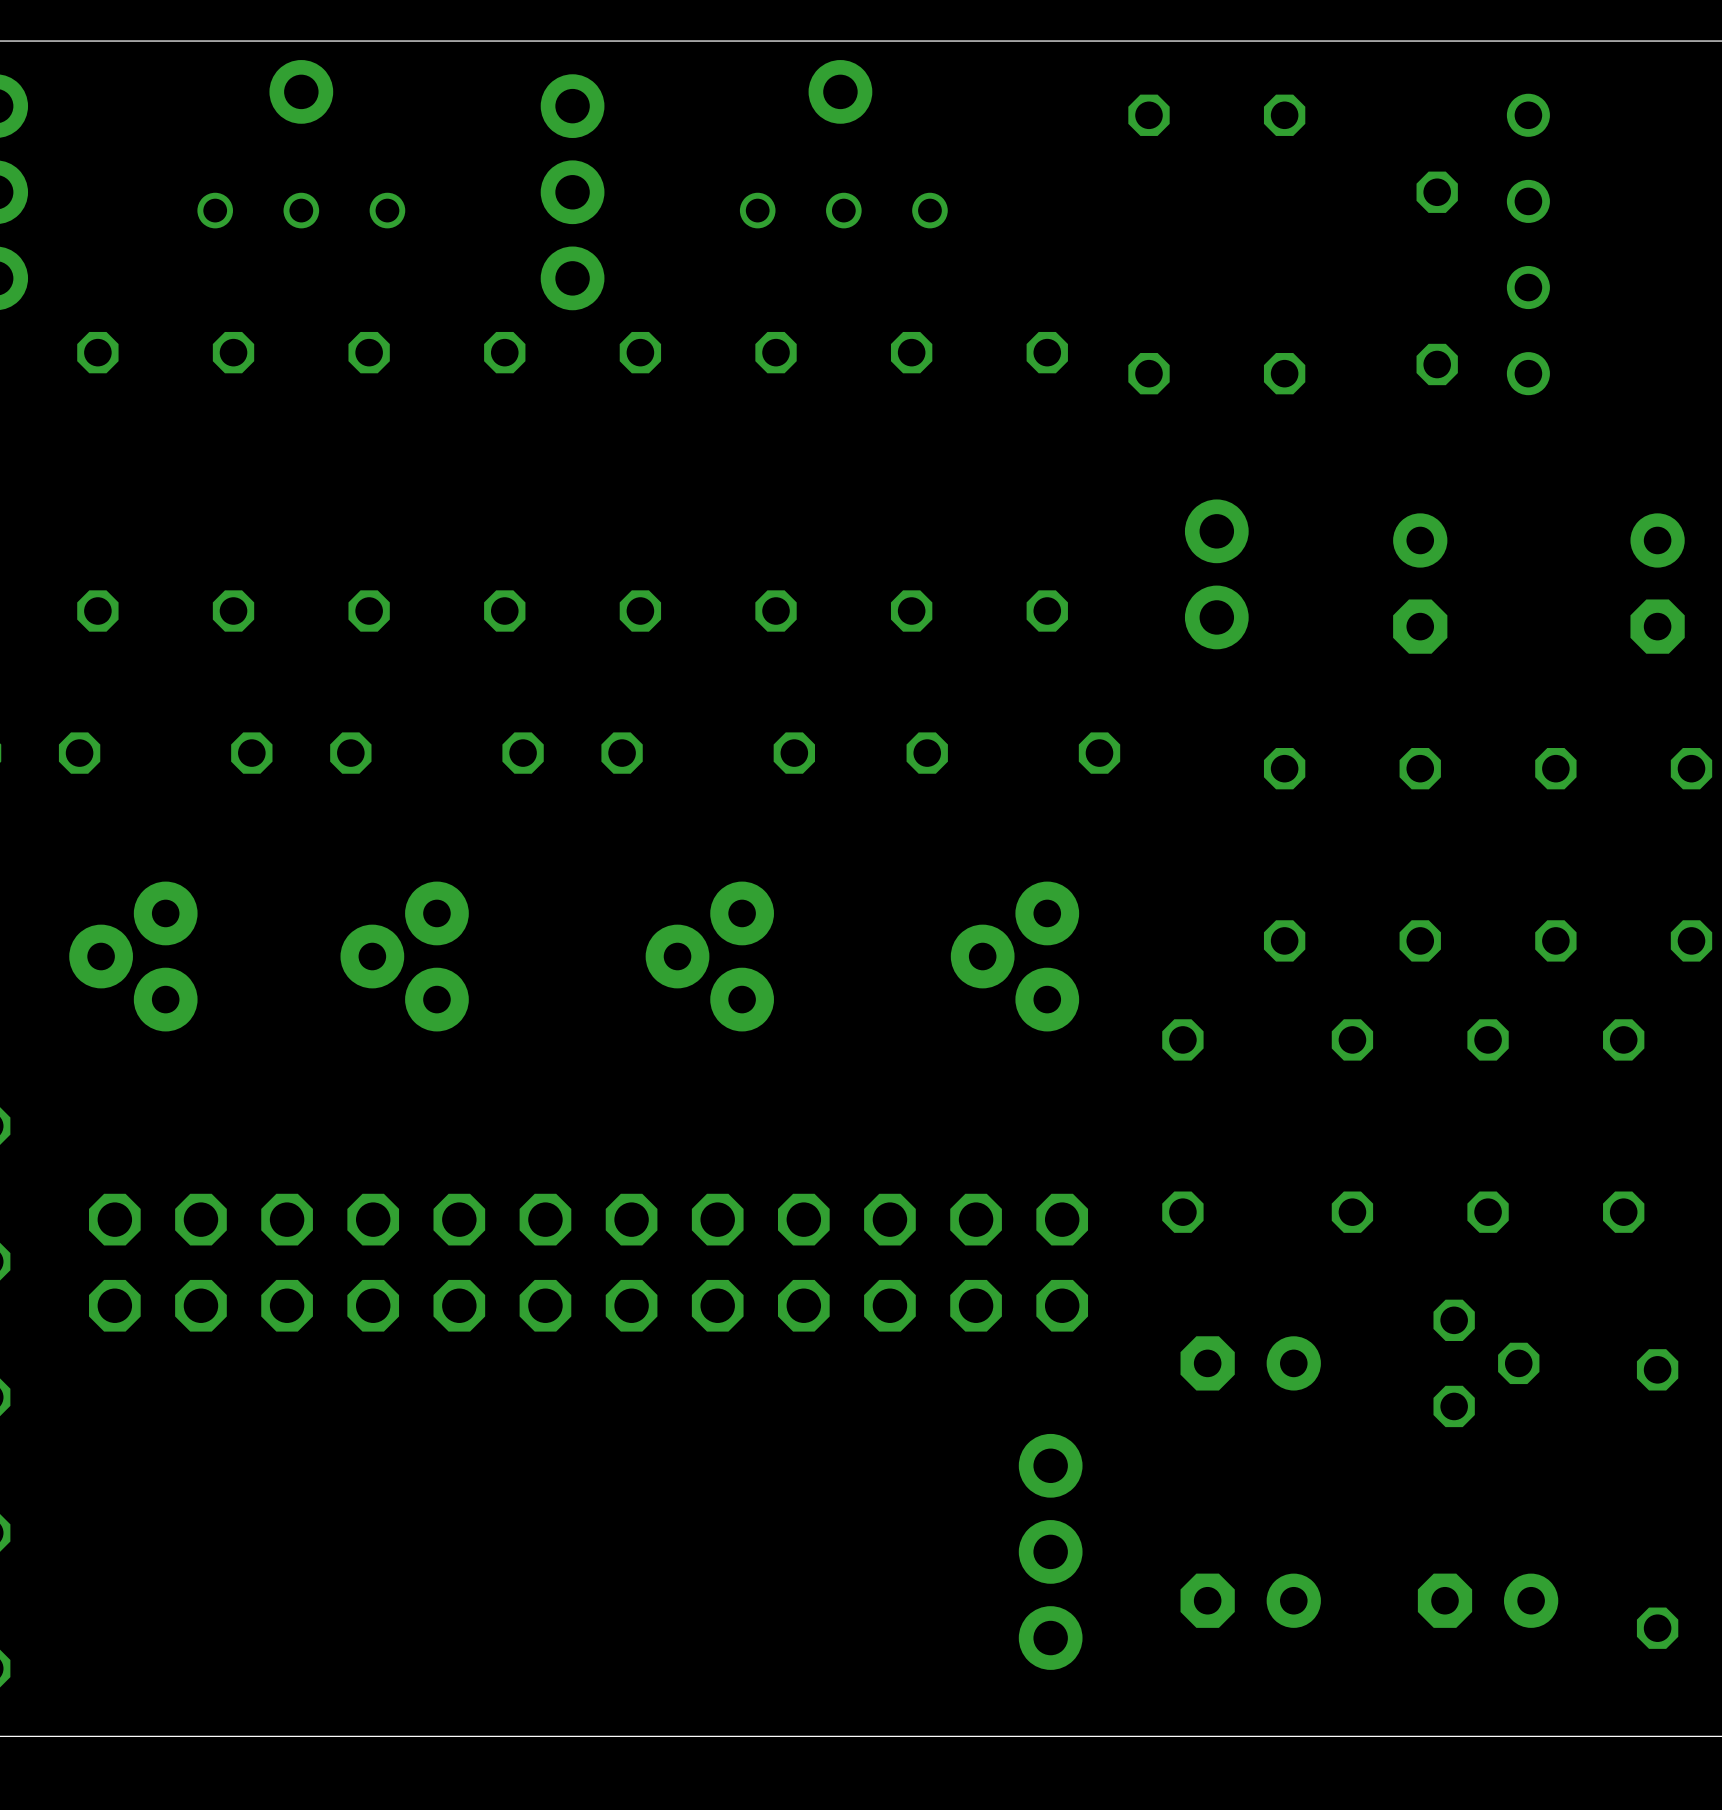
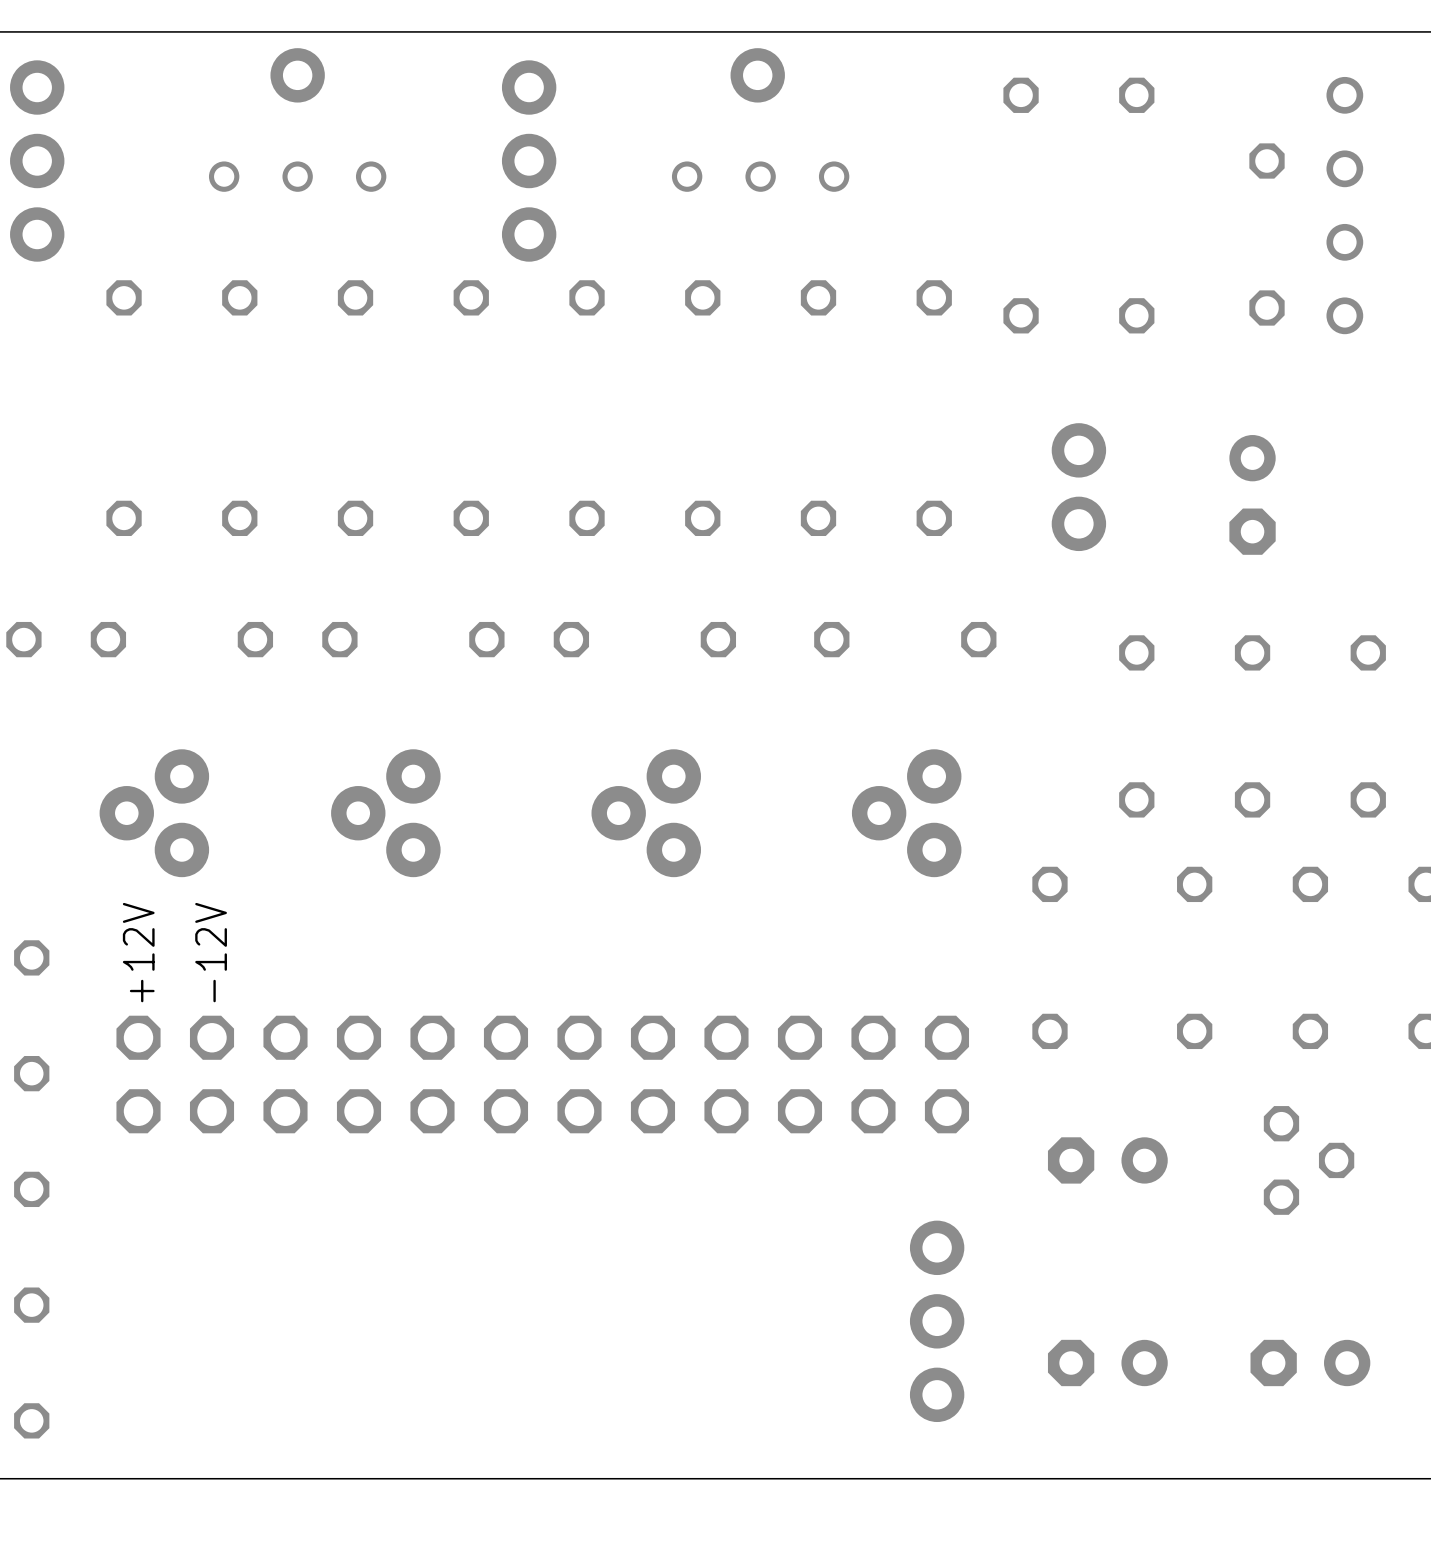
text: none -> -12V (211, 952)
text: none -> +12V (138, 952)

